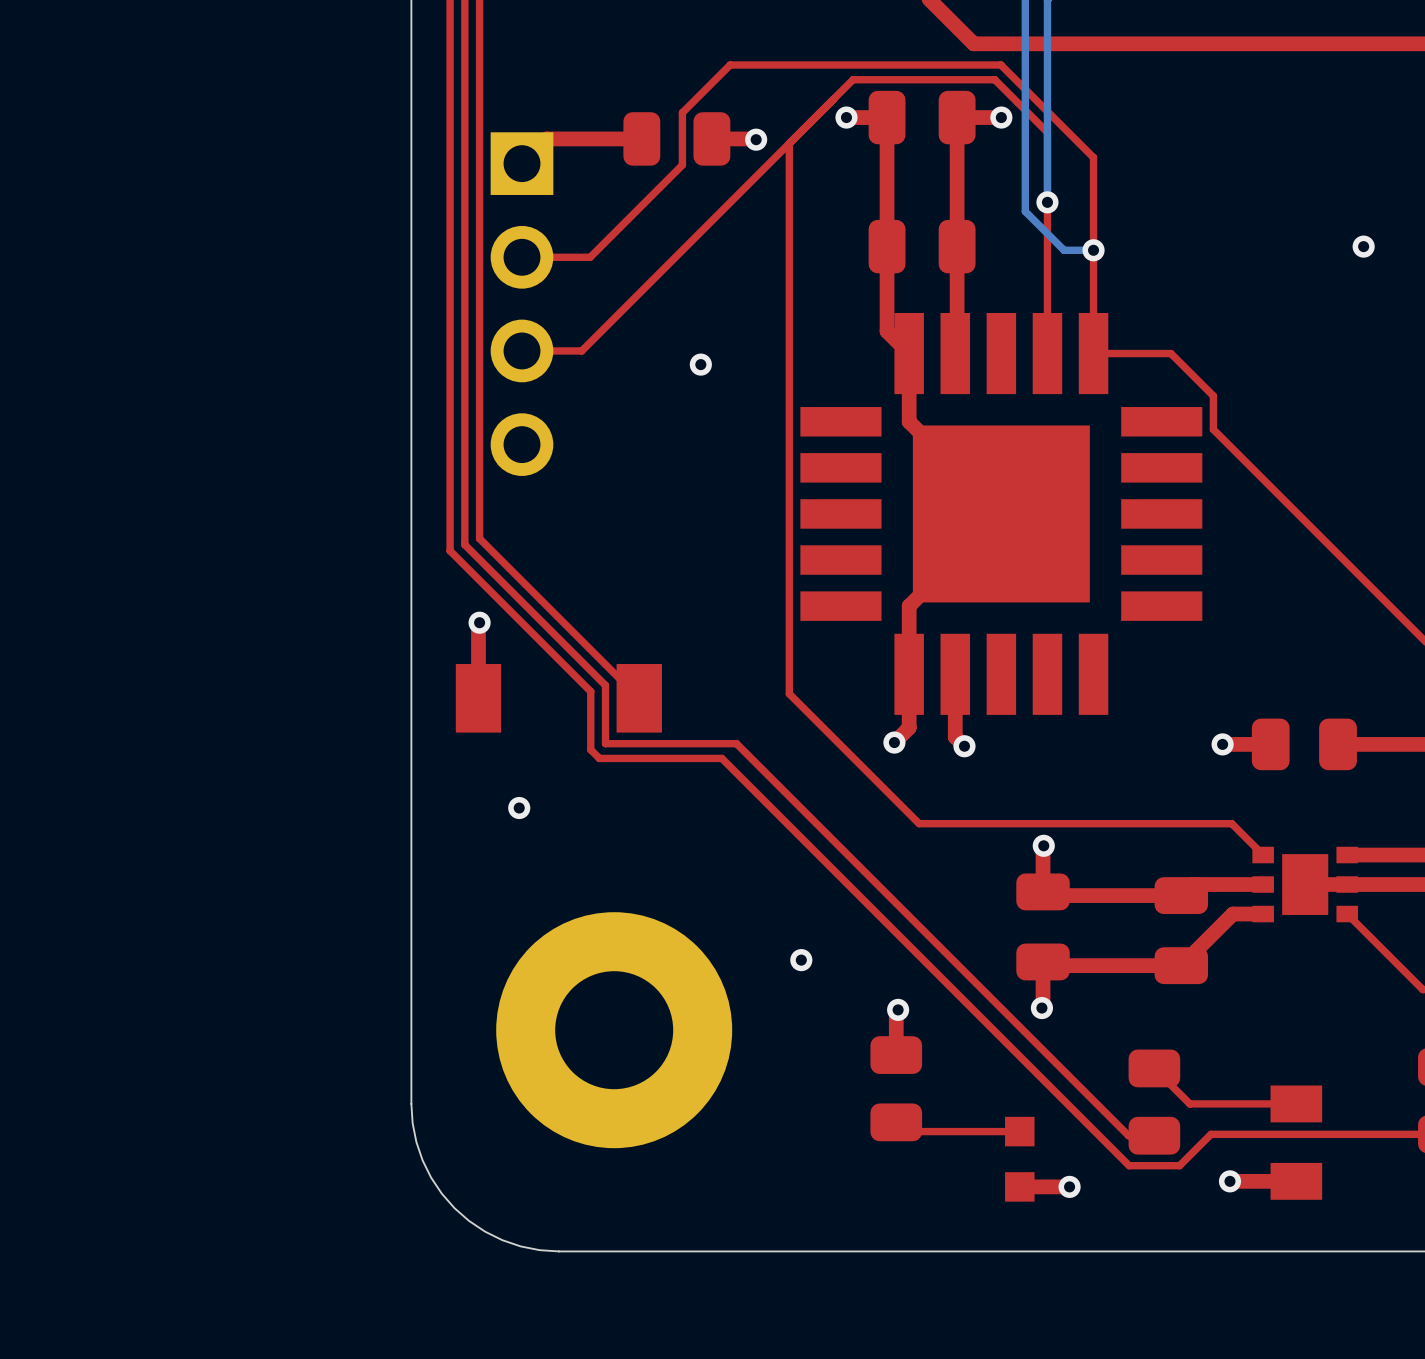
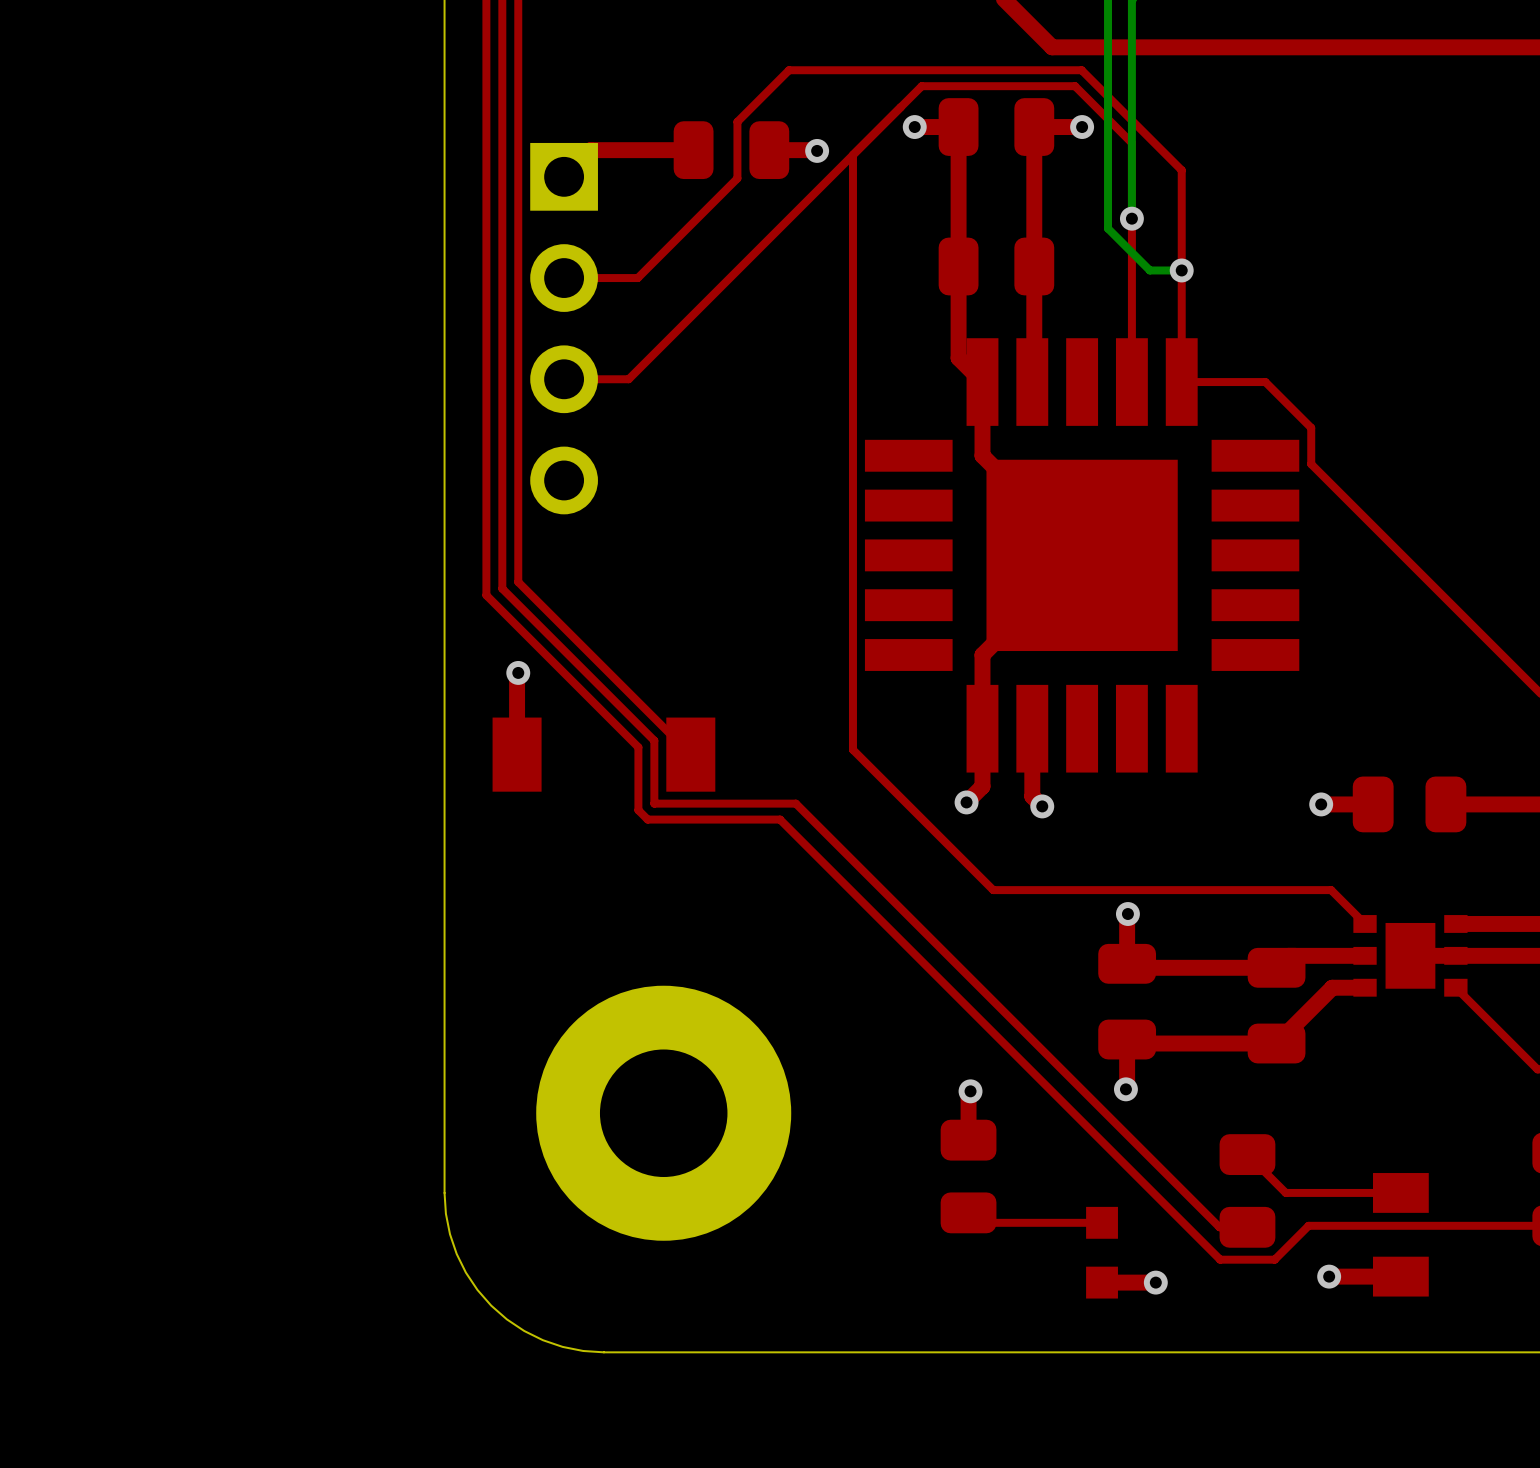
via: (1363, 246) -> none
via: (700, 364) -> none
via: (519, 808) -> none
via: (801, 960) -> none

